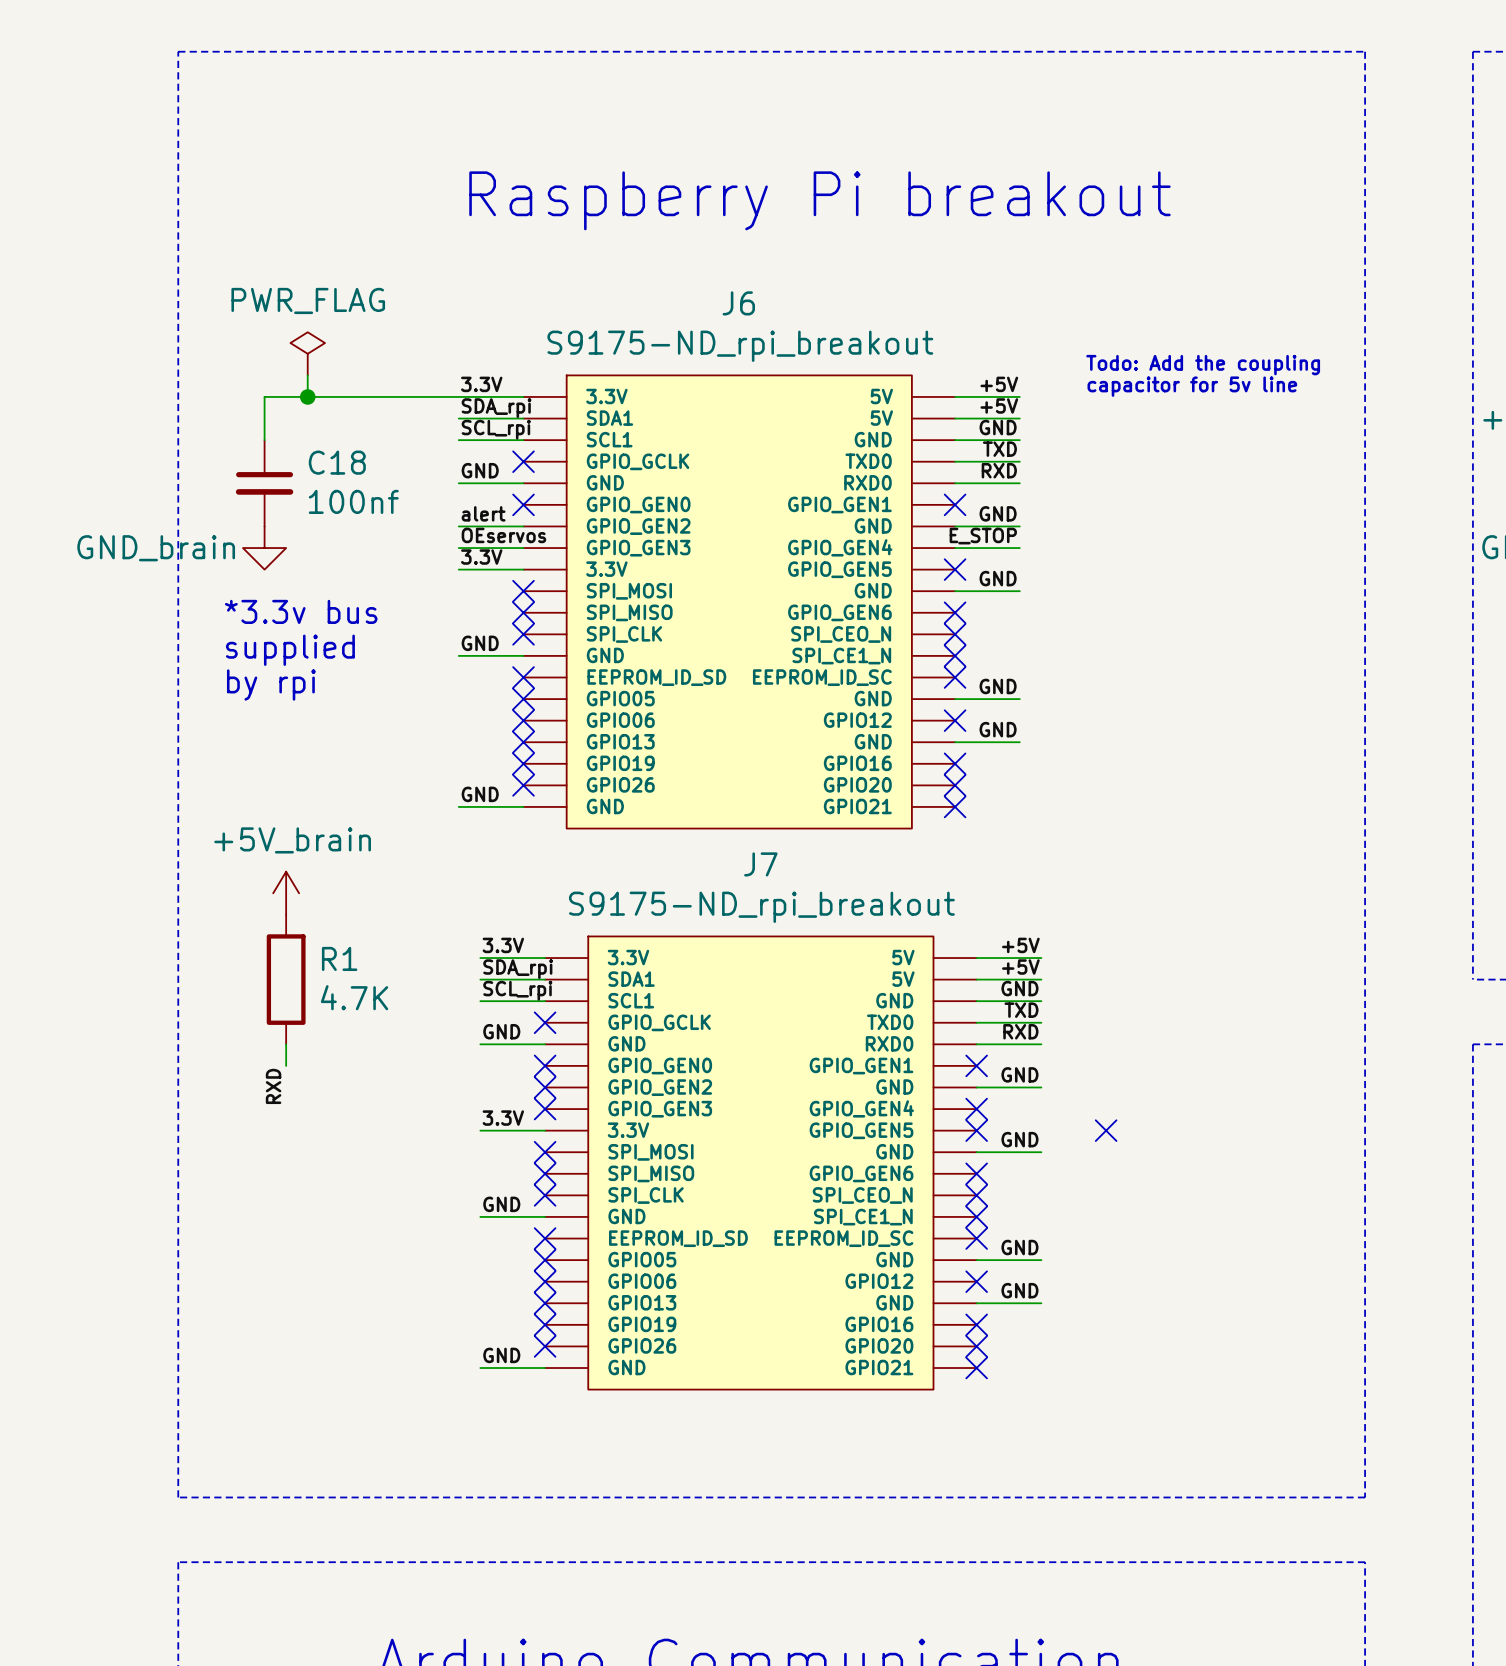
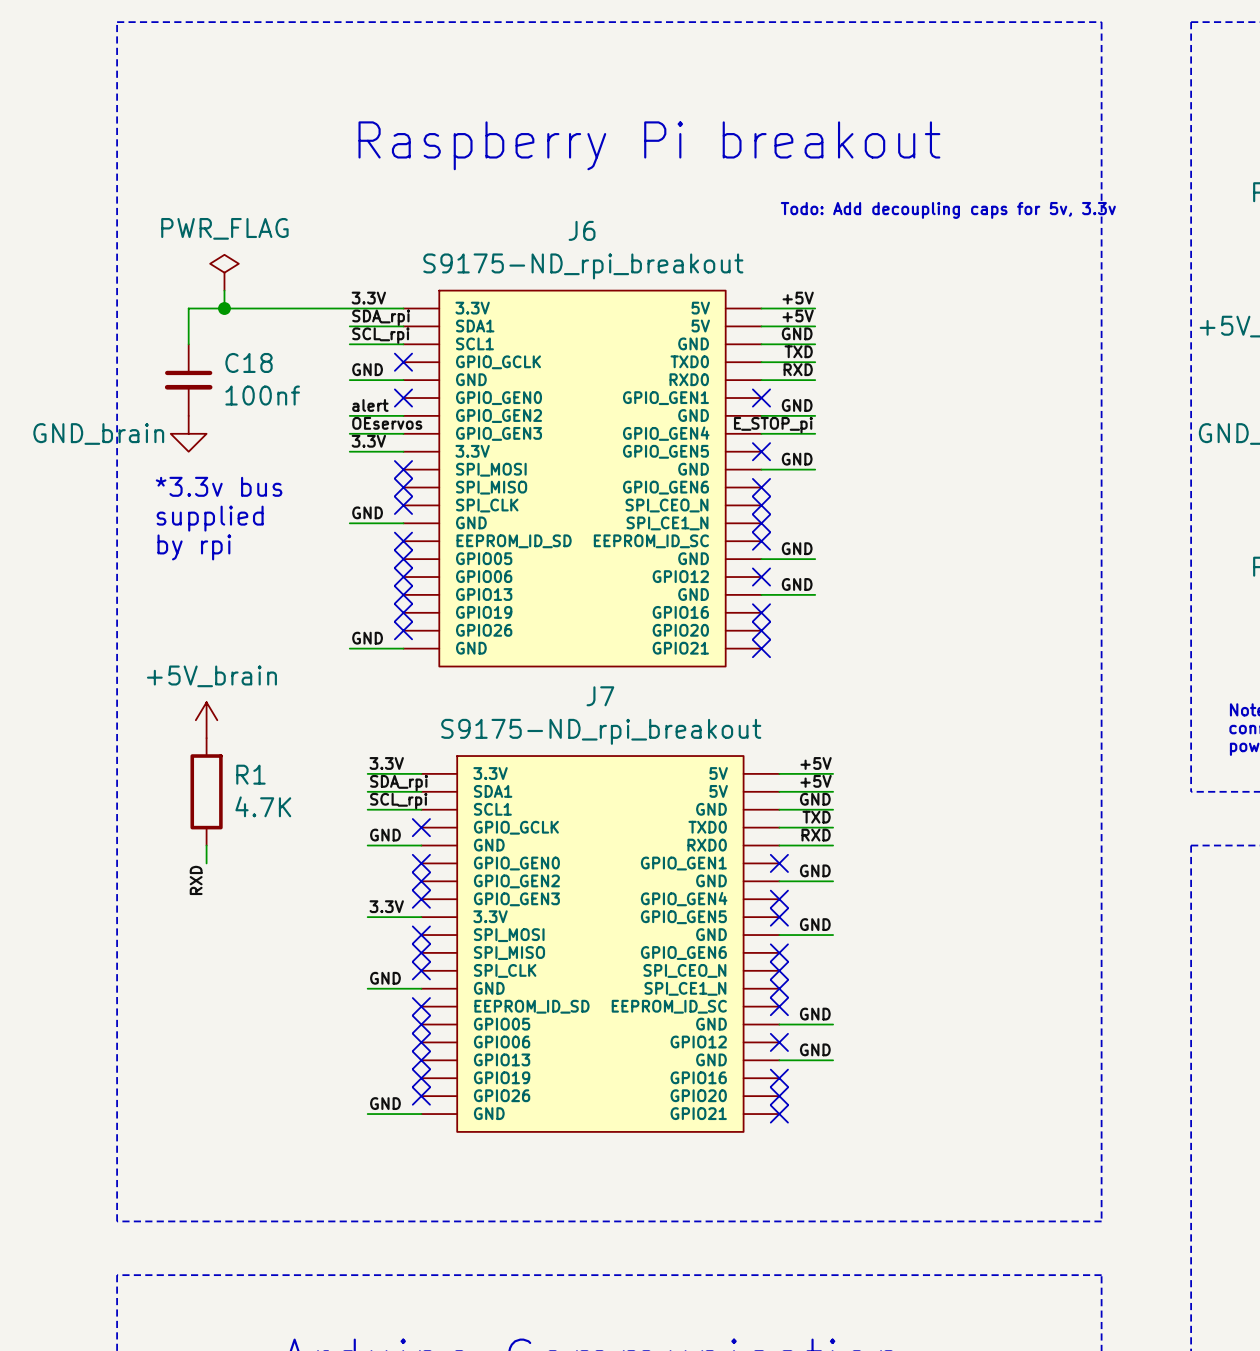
text: none -> Todo: Add decoupling caps for 5v, 3.3v (948, 210)
text: Todo: Add the coupling (1203, 365) -> none
text: capacitor for 5v line (1192, 386) -> none
label: E_STOP (983, 536) -> E_STOP_pi (773, 425)
no-connect mark: (1106, 1130) -> none

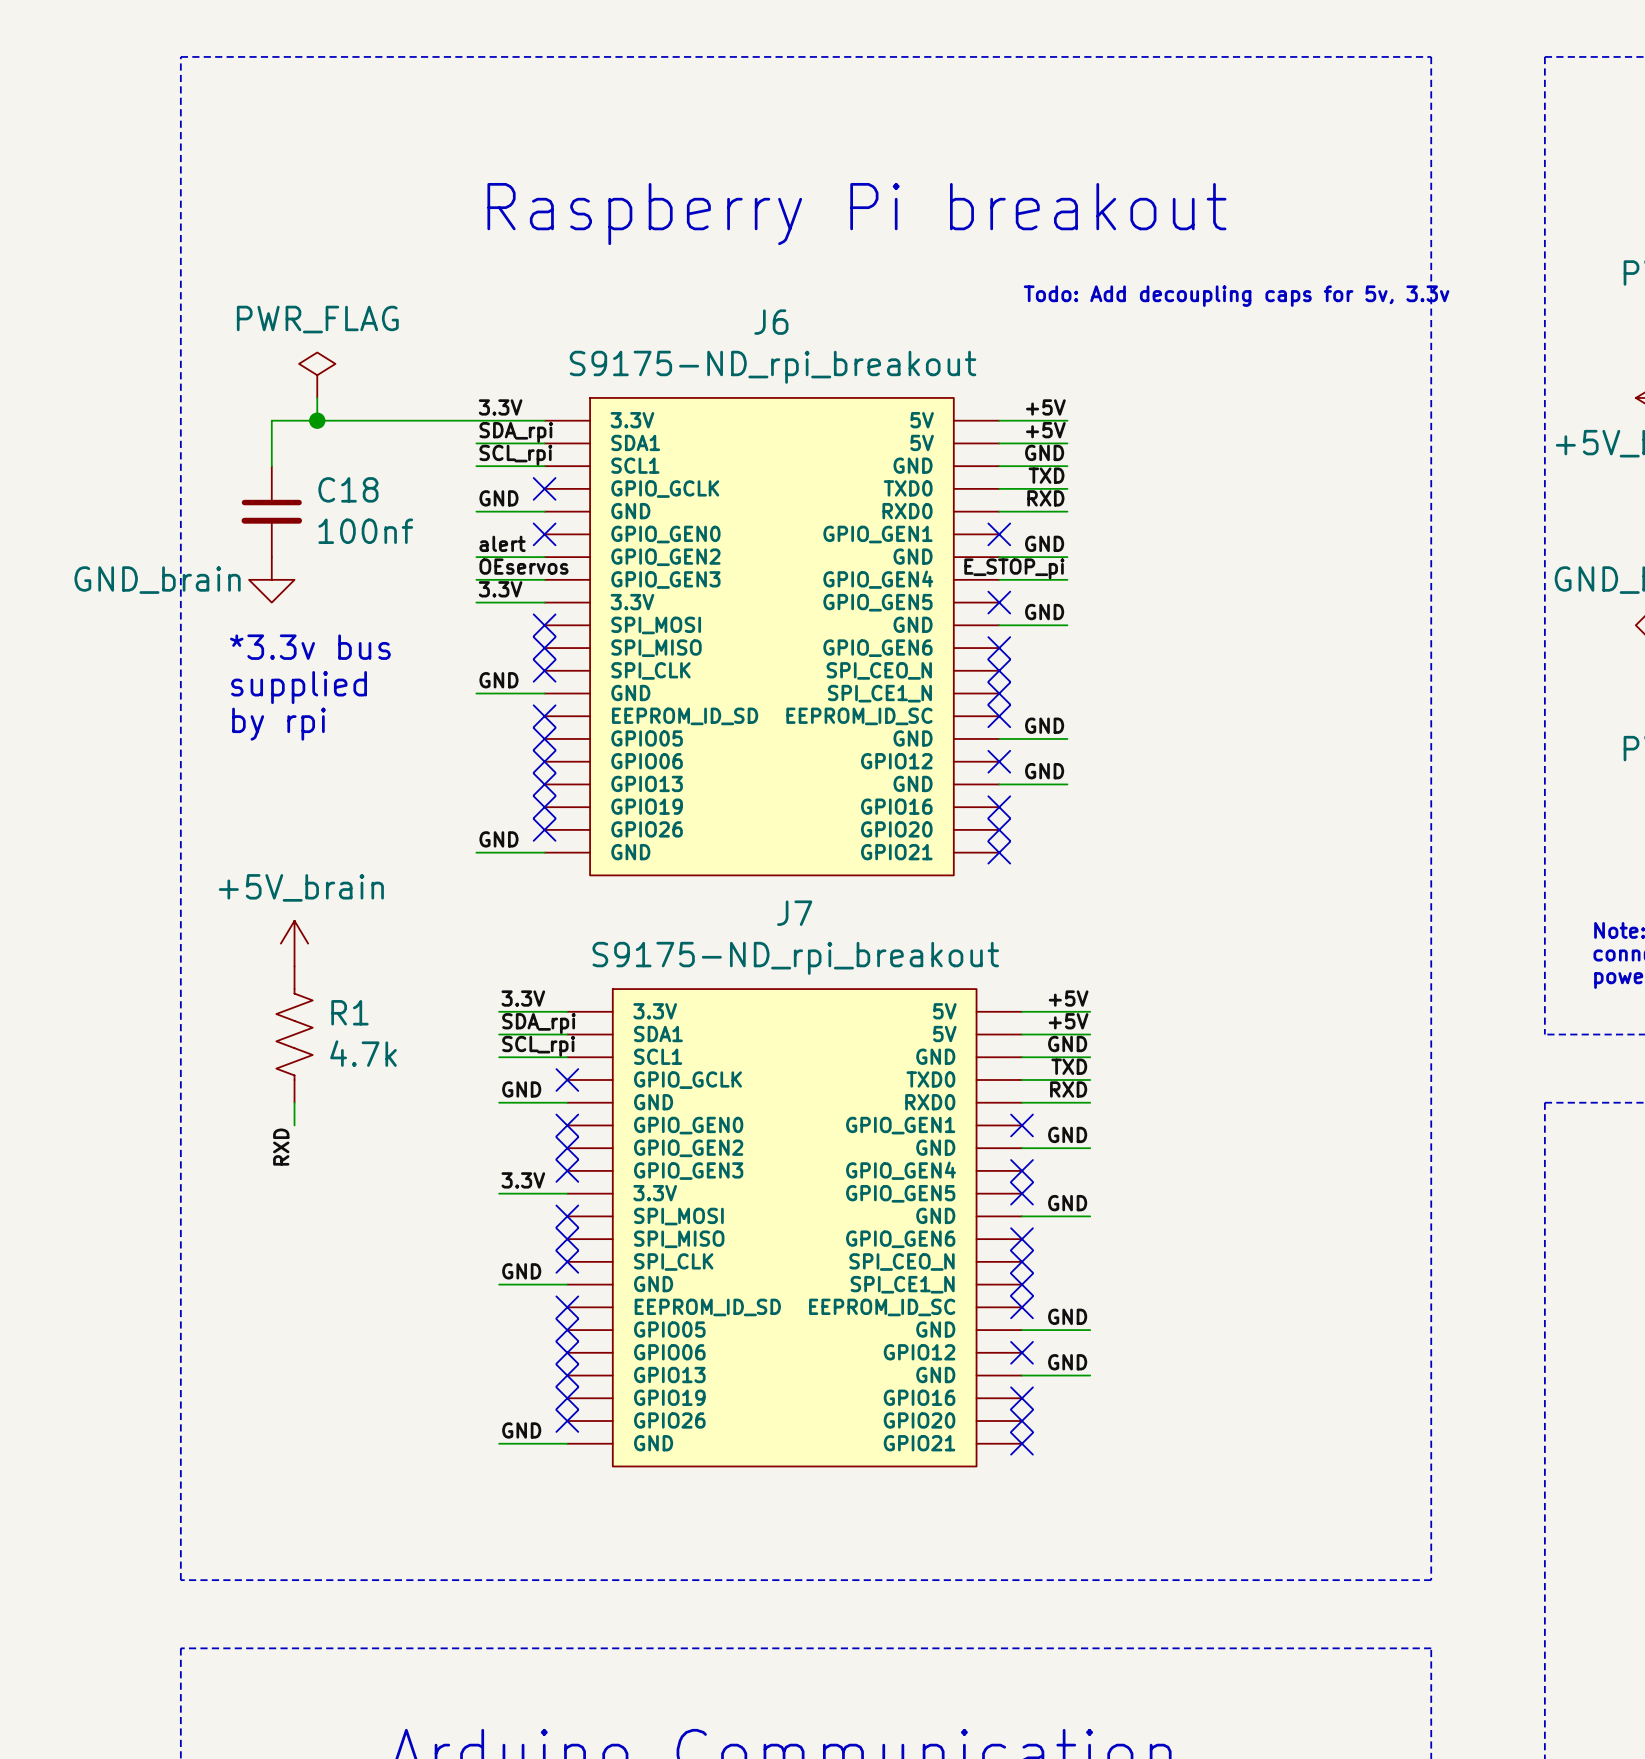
R1 symbol: [190, 738, 223, 846] -> [276, 966, 313, 1103]
R1 value: 4.7K (263, 806) -> 4.7k (363, 1053)

